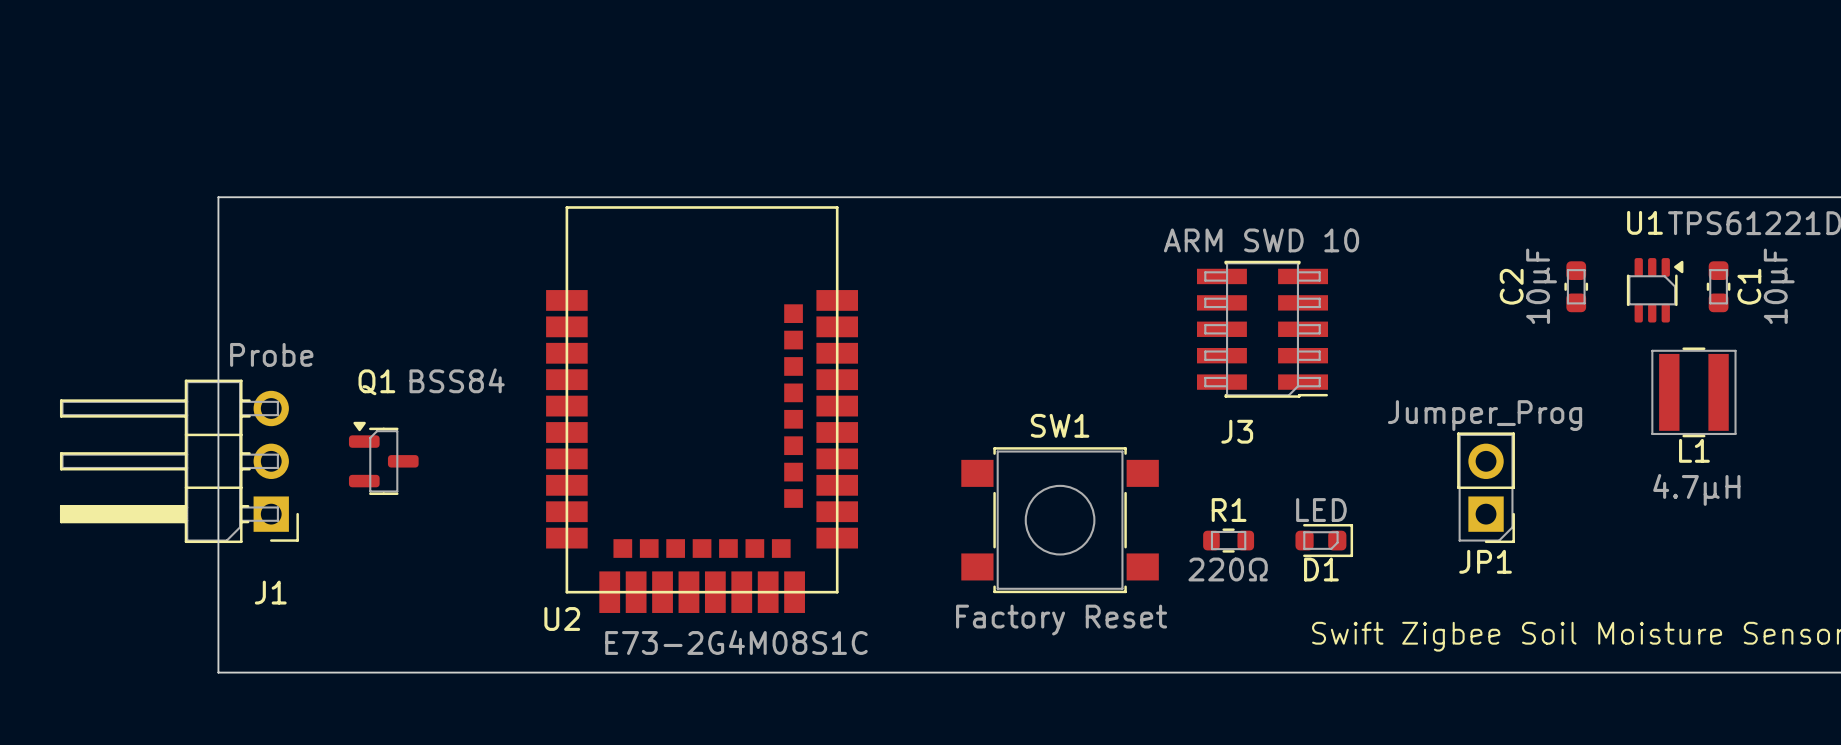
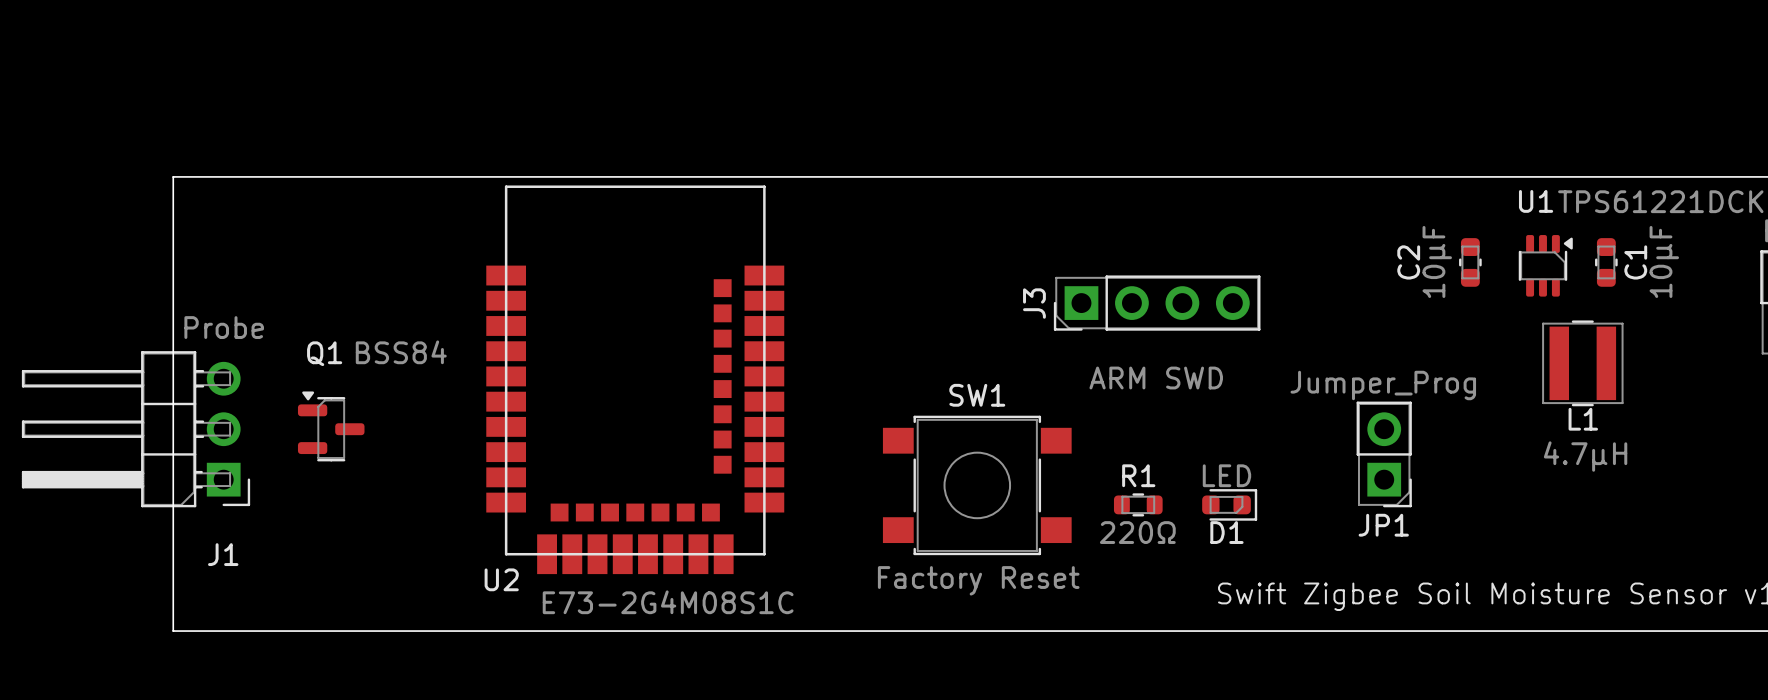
J3 value: ARM SWD 10 (1261, 240) -> ARM SWD (1156, 378)
J3 footprint: [1197, 260, 1329, 398] -> [1053, 275, 1261, 331]
J3 name position: J3 (1237, 431) -> J3 (1034, 303)

